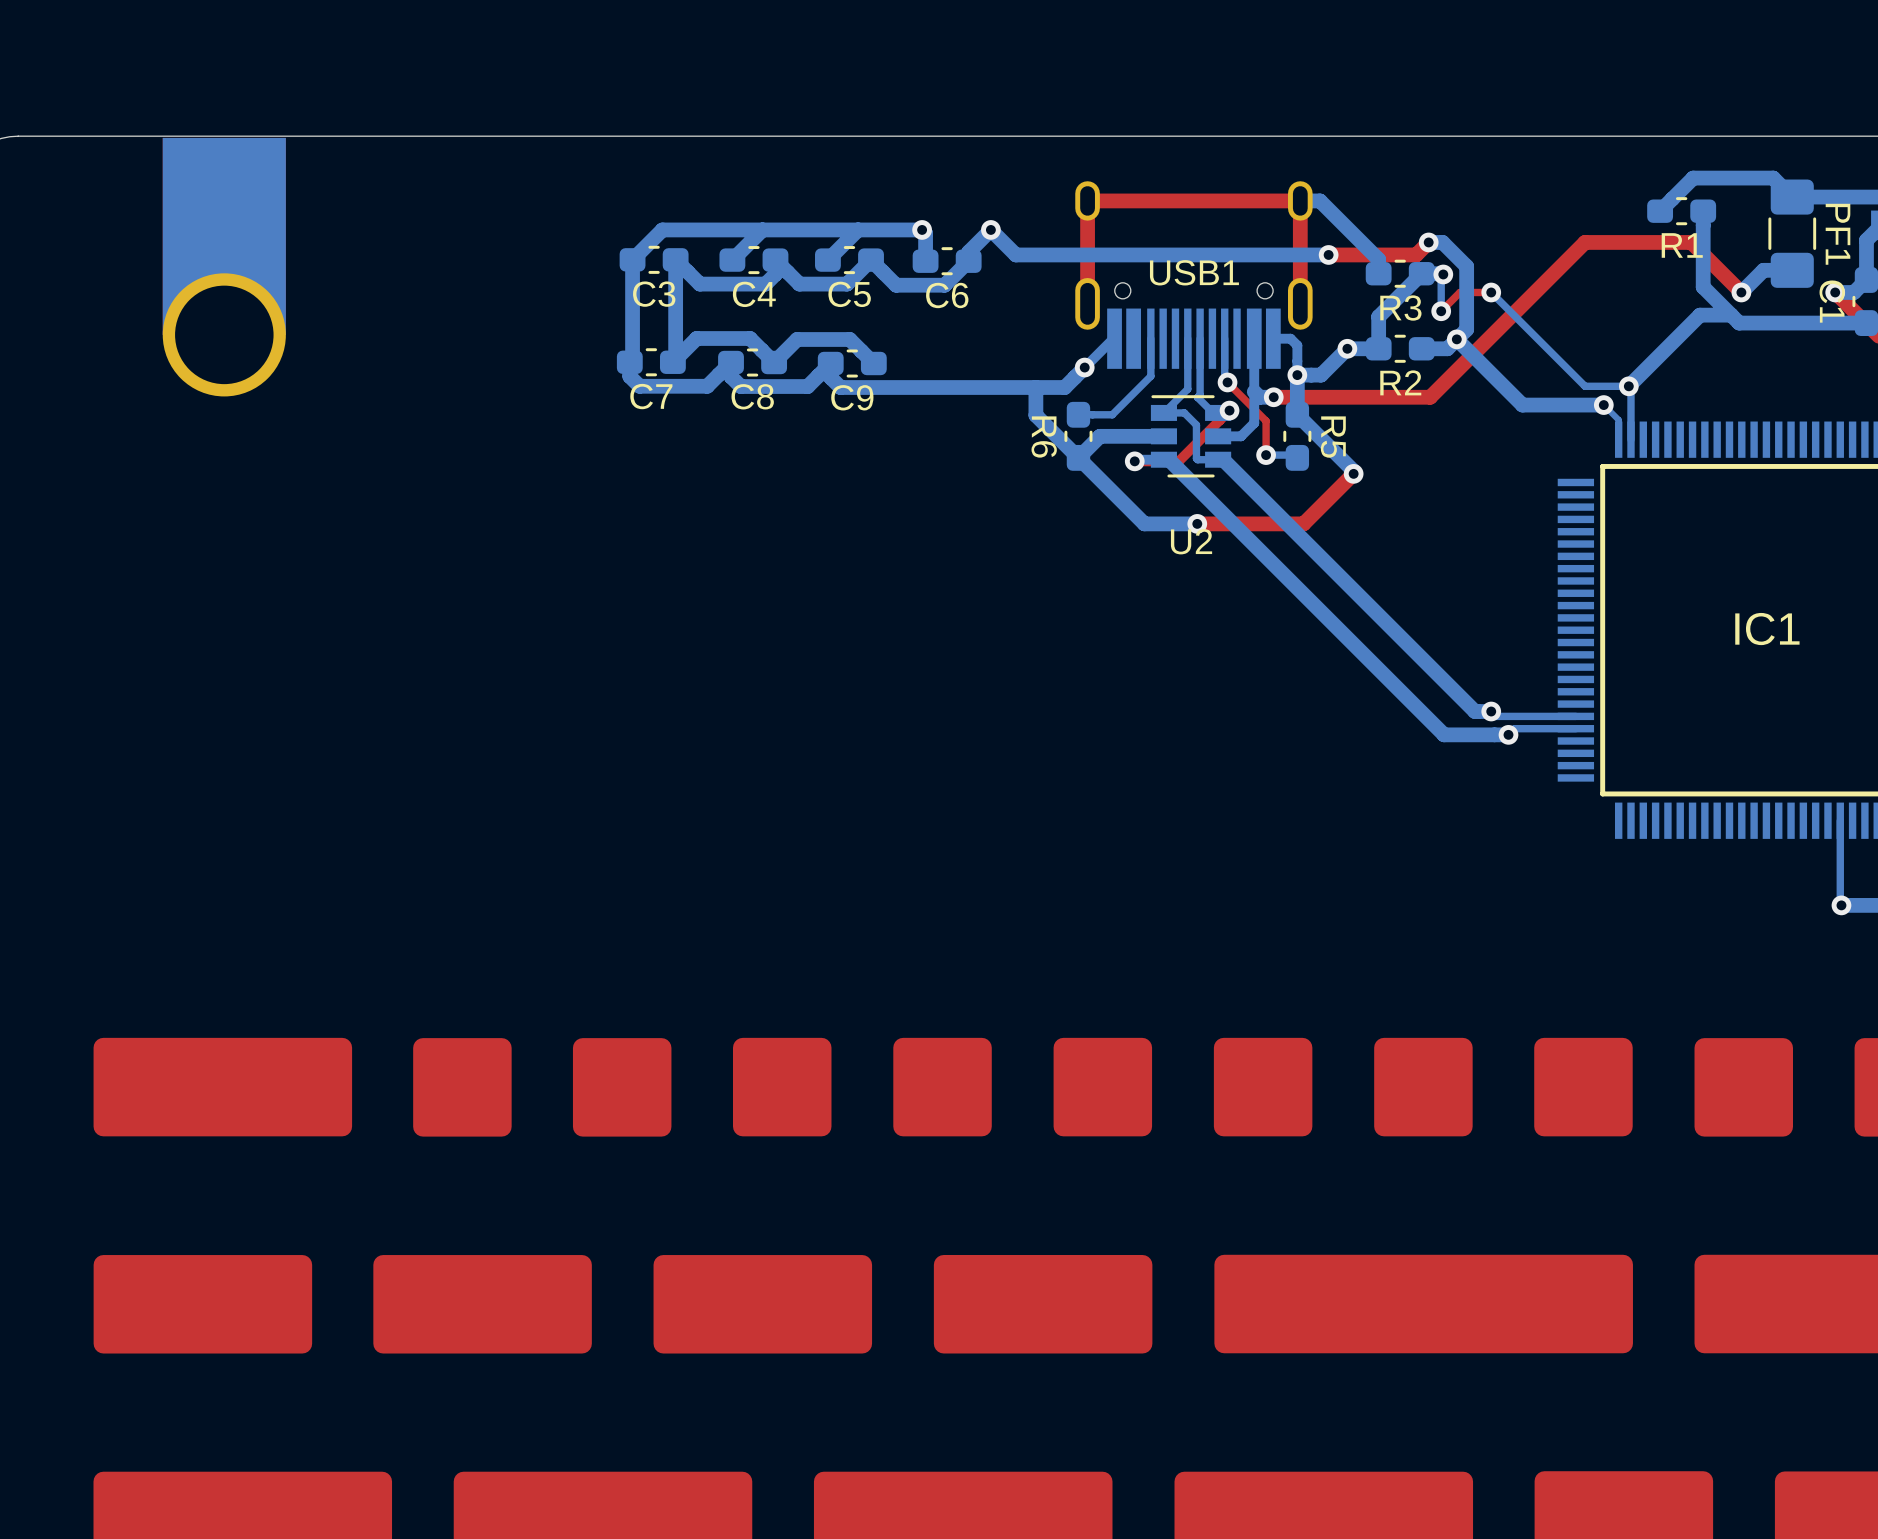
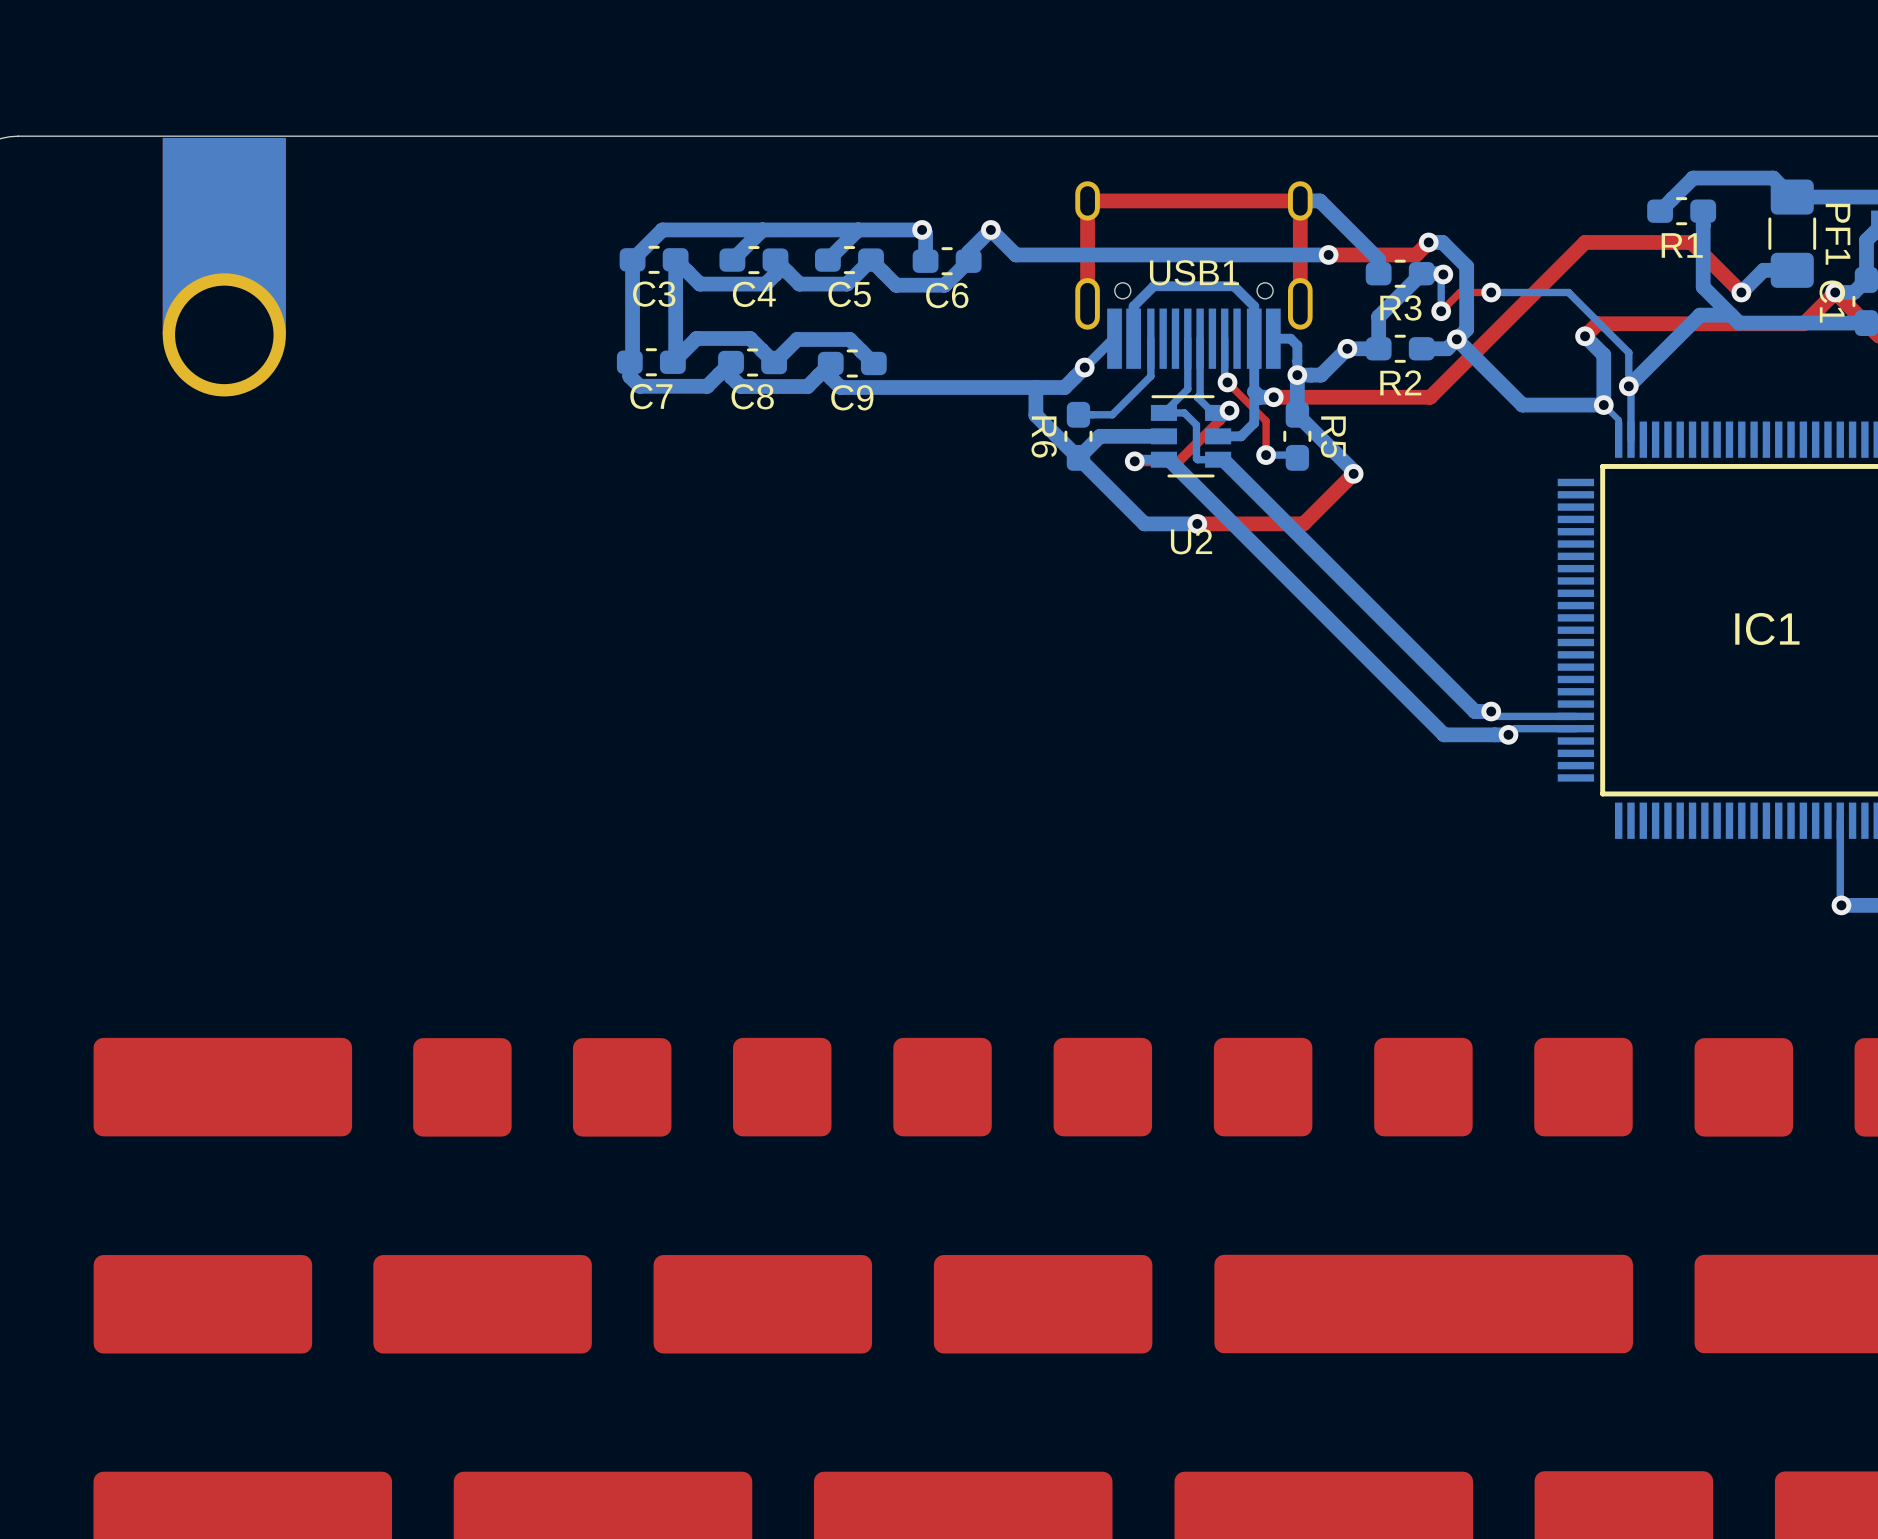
bottom track: (1491, 292) (1585, 386) (1628, 386) -> (1491, 292) (1568, 292) (1628, 352) (1628, 386)
top track: none -> (1835, 292) (1803, 323) (1597, 323) (1585, 336)
bottom track: none -> (1585, 336) (1603, 355) (1603, 405)
via: none -> (1585, 336)
bottom track: none -> (1254, 338) (1254, 306) (1234, 286) (1153, 286) (1133, 306) (1133, 338)

